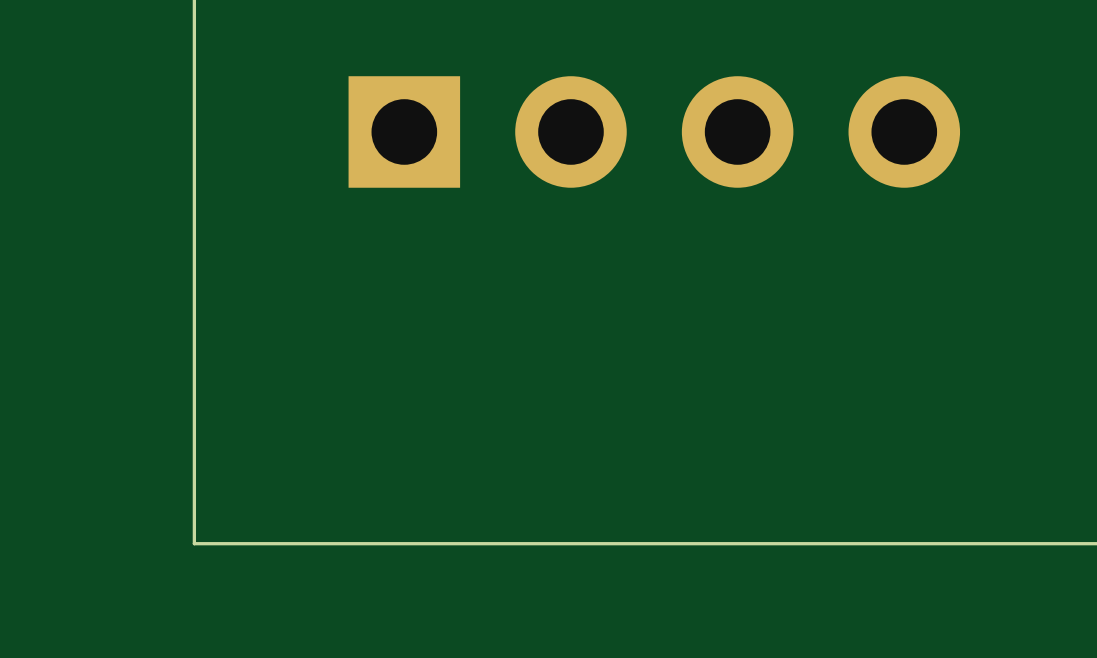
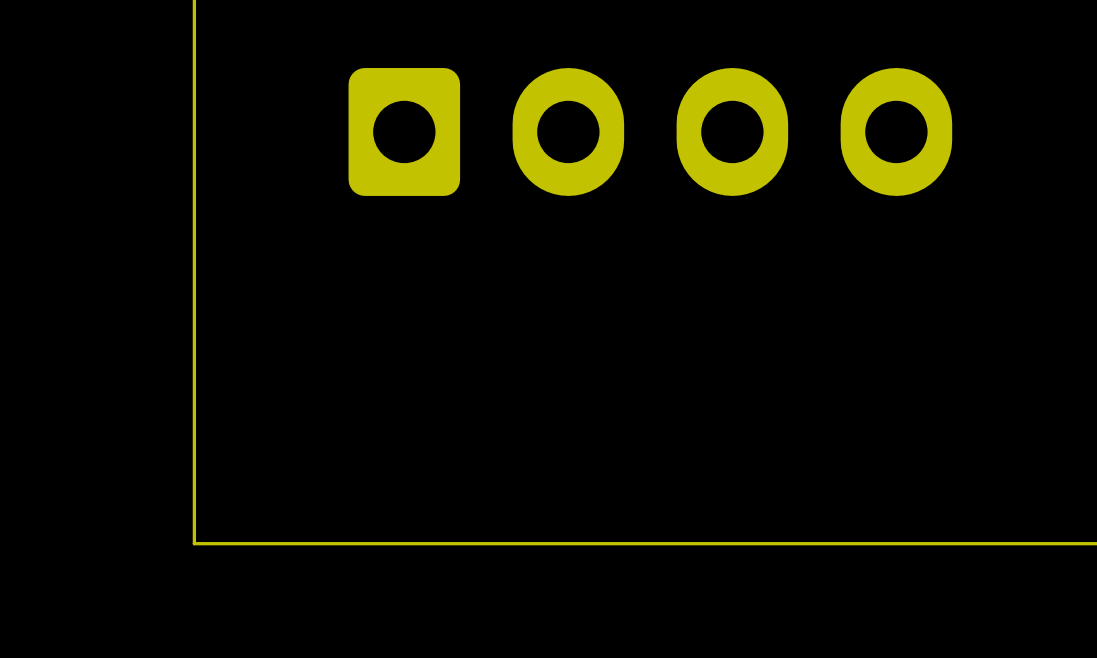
part footprint: [348, 76, 961, 188] -> [348, 68, 953, 196]

